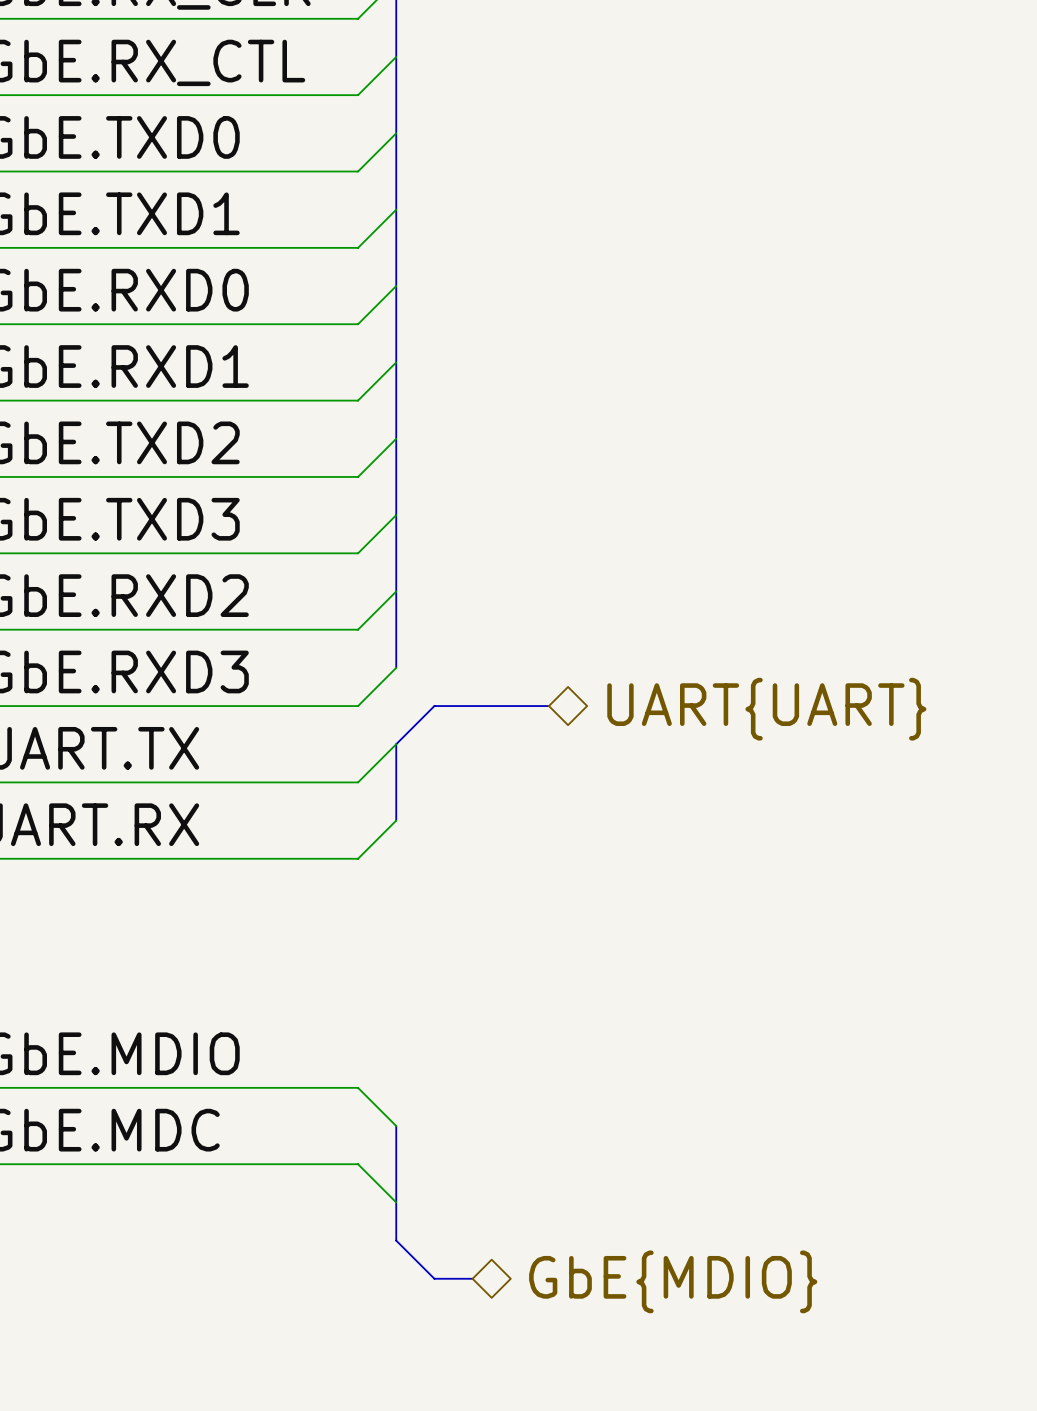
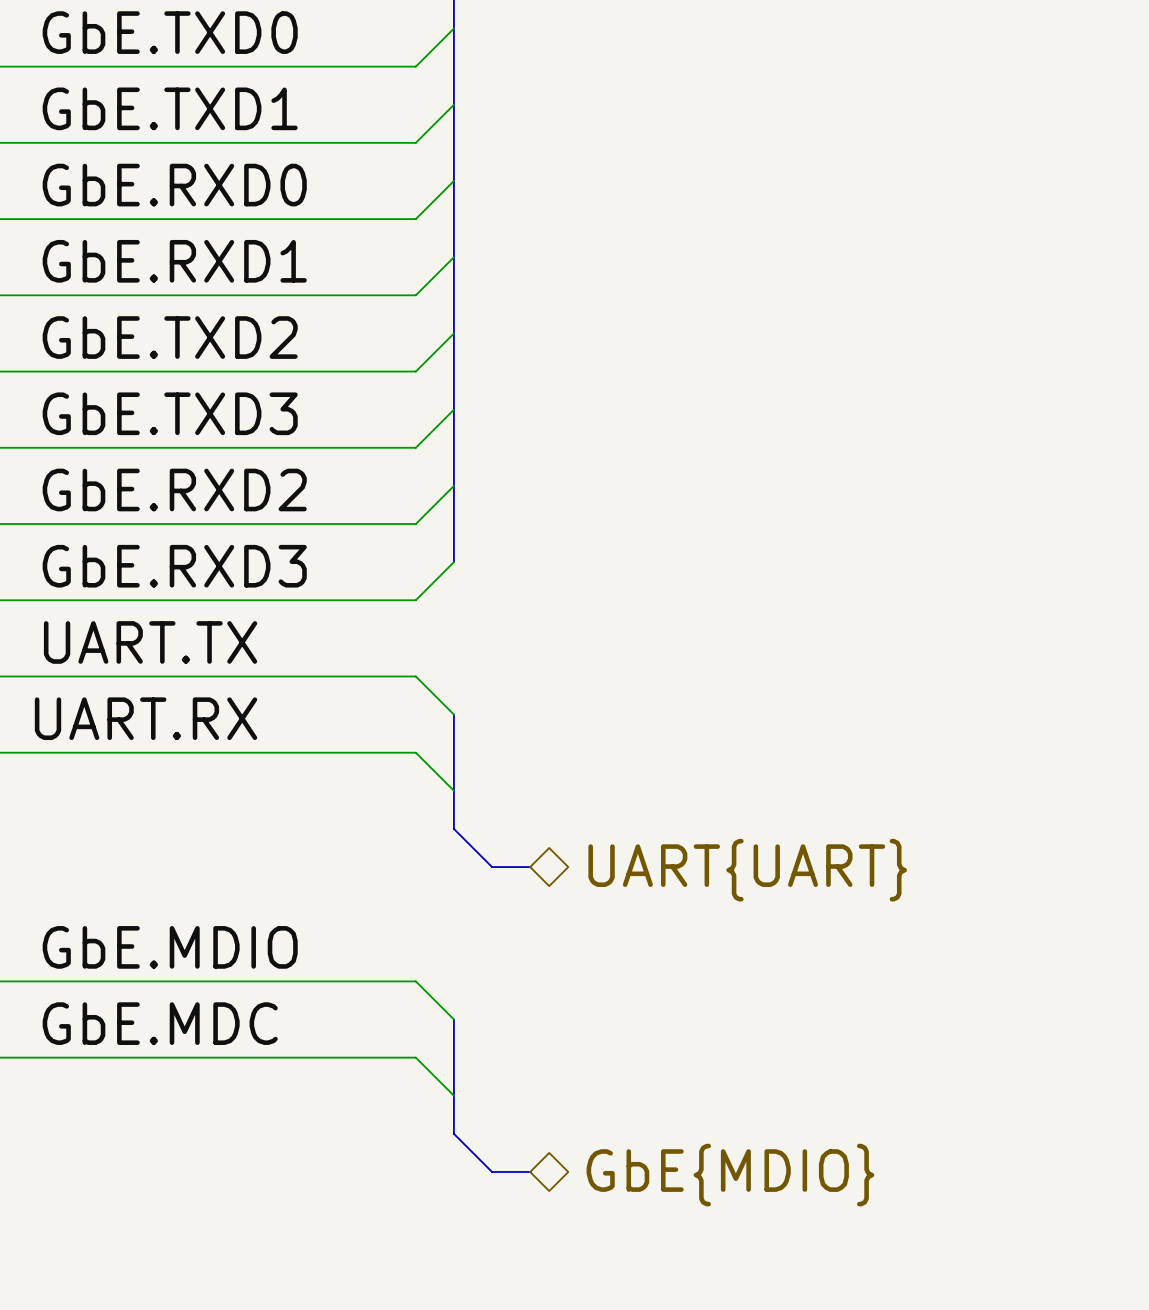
bus: (548, 706) (434, 706) (396, 744) (396, 820) -> (530, 867) (492, 867) (453, 828) (453, 714)
hierarchical label position: UART{UART} (766, 709) -> UART{UART} (747, 870)
wire: (396, 744) (358, 782) -> (453, 714) (415, 676)
wire: (396, 820) (358, 858) -> (453, 790) (415, 752)

